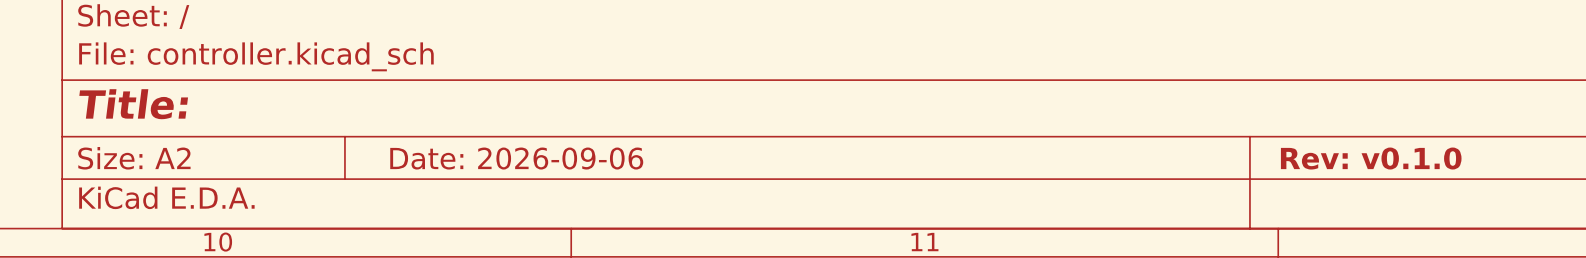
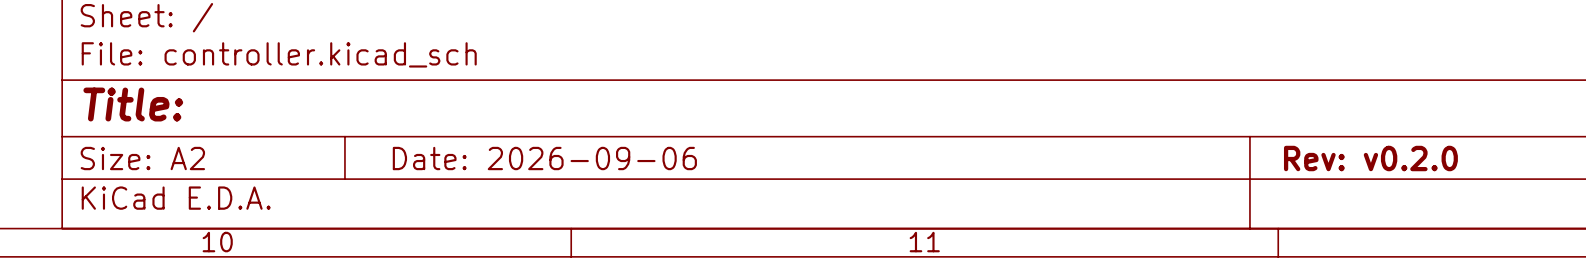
title block: Rev: v0.1.0 (1371, 158) -> Rev: v0.2.0 (1370, 158)

